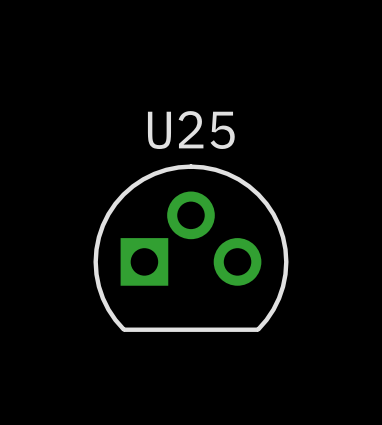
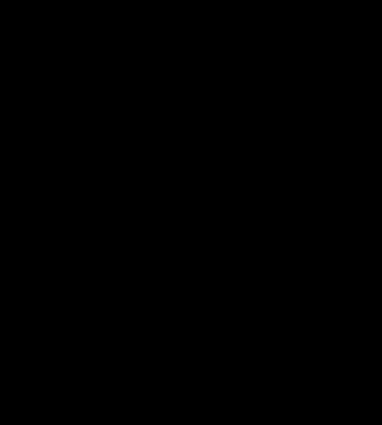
U25: (190, 248) -> none

